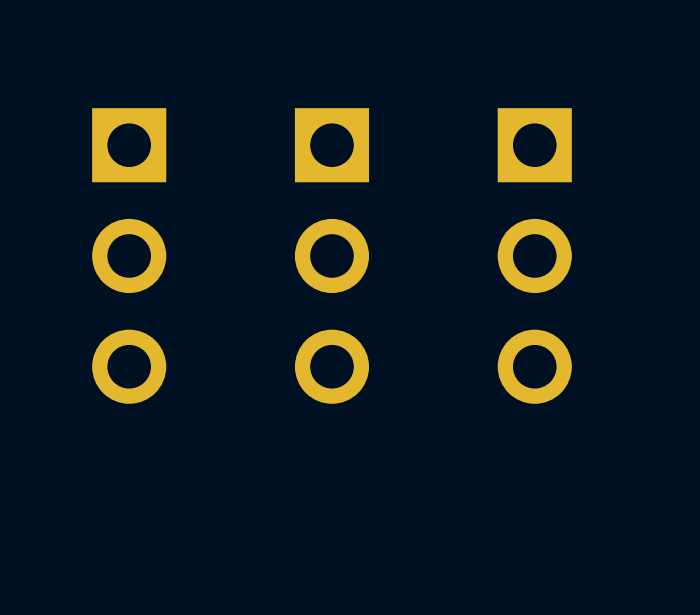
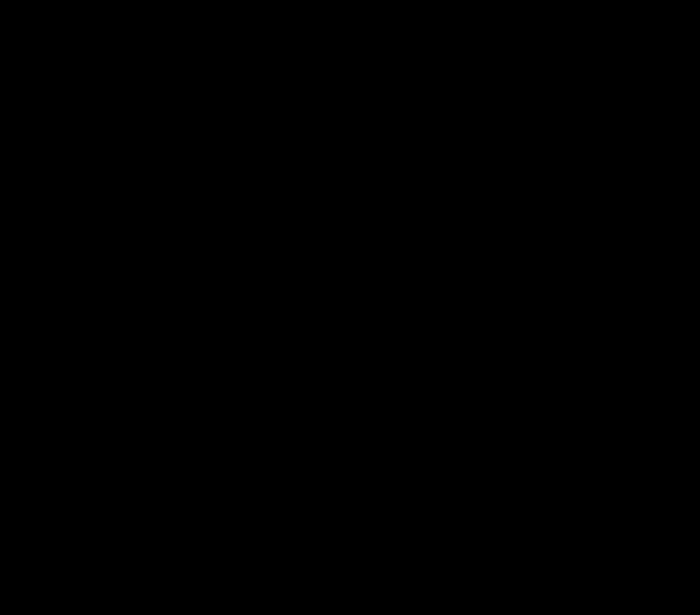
part: (129, 255) -> none
part: (331, 255) -> none
part: (534, 255) -> none

